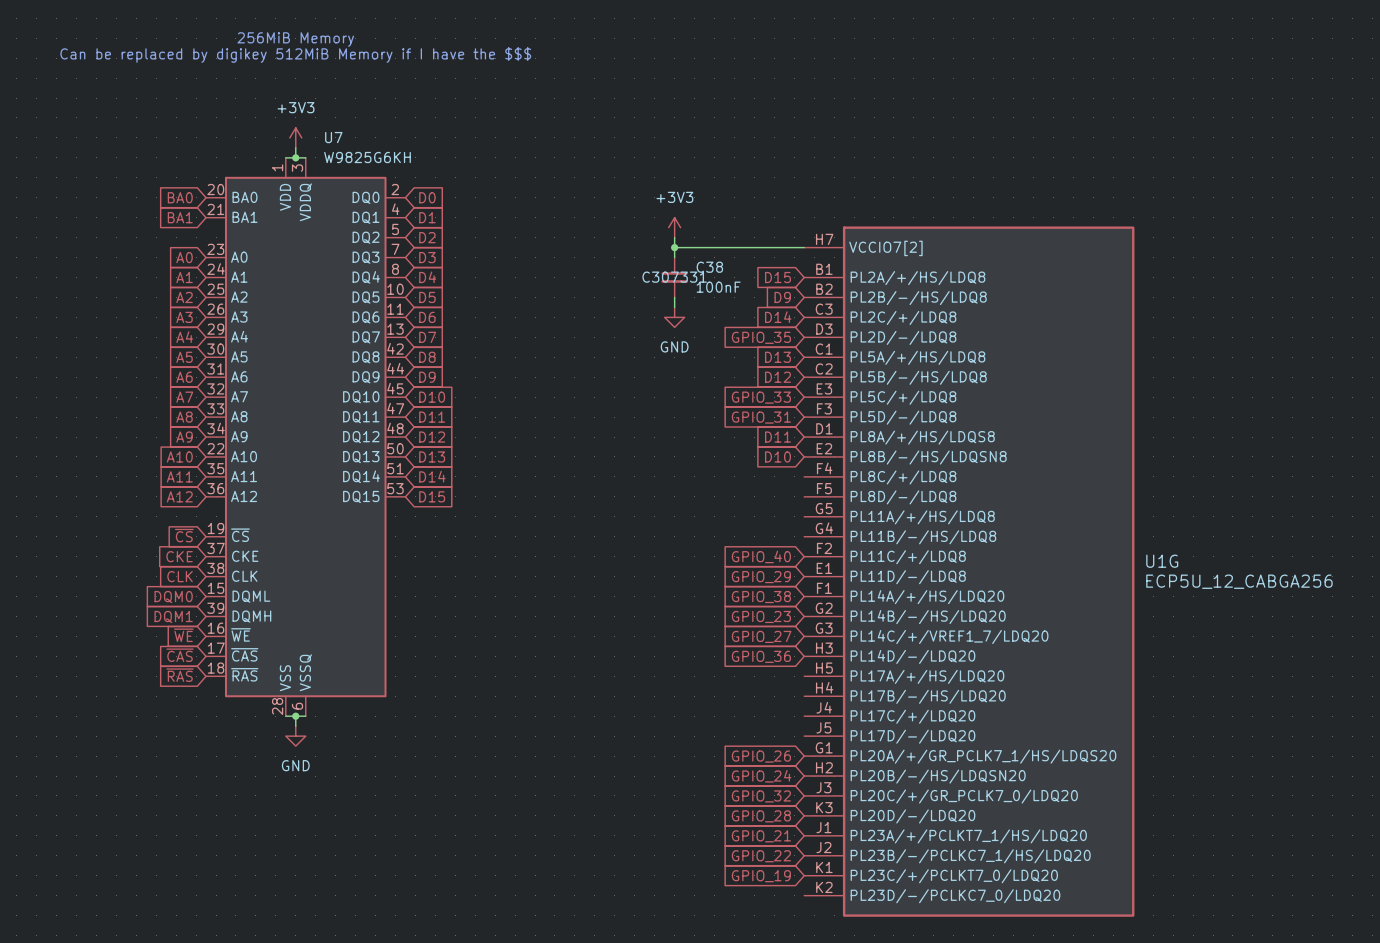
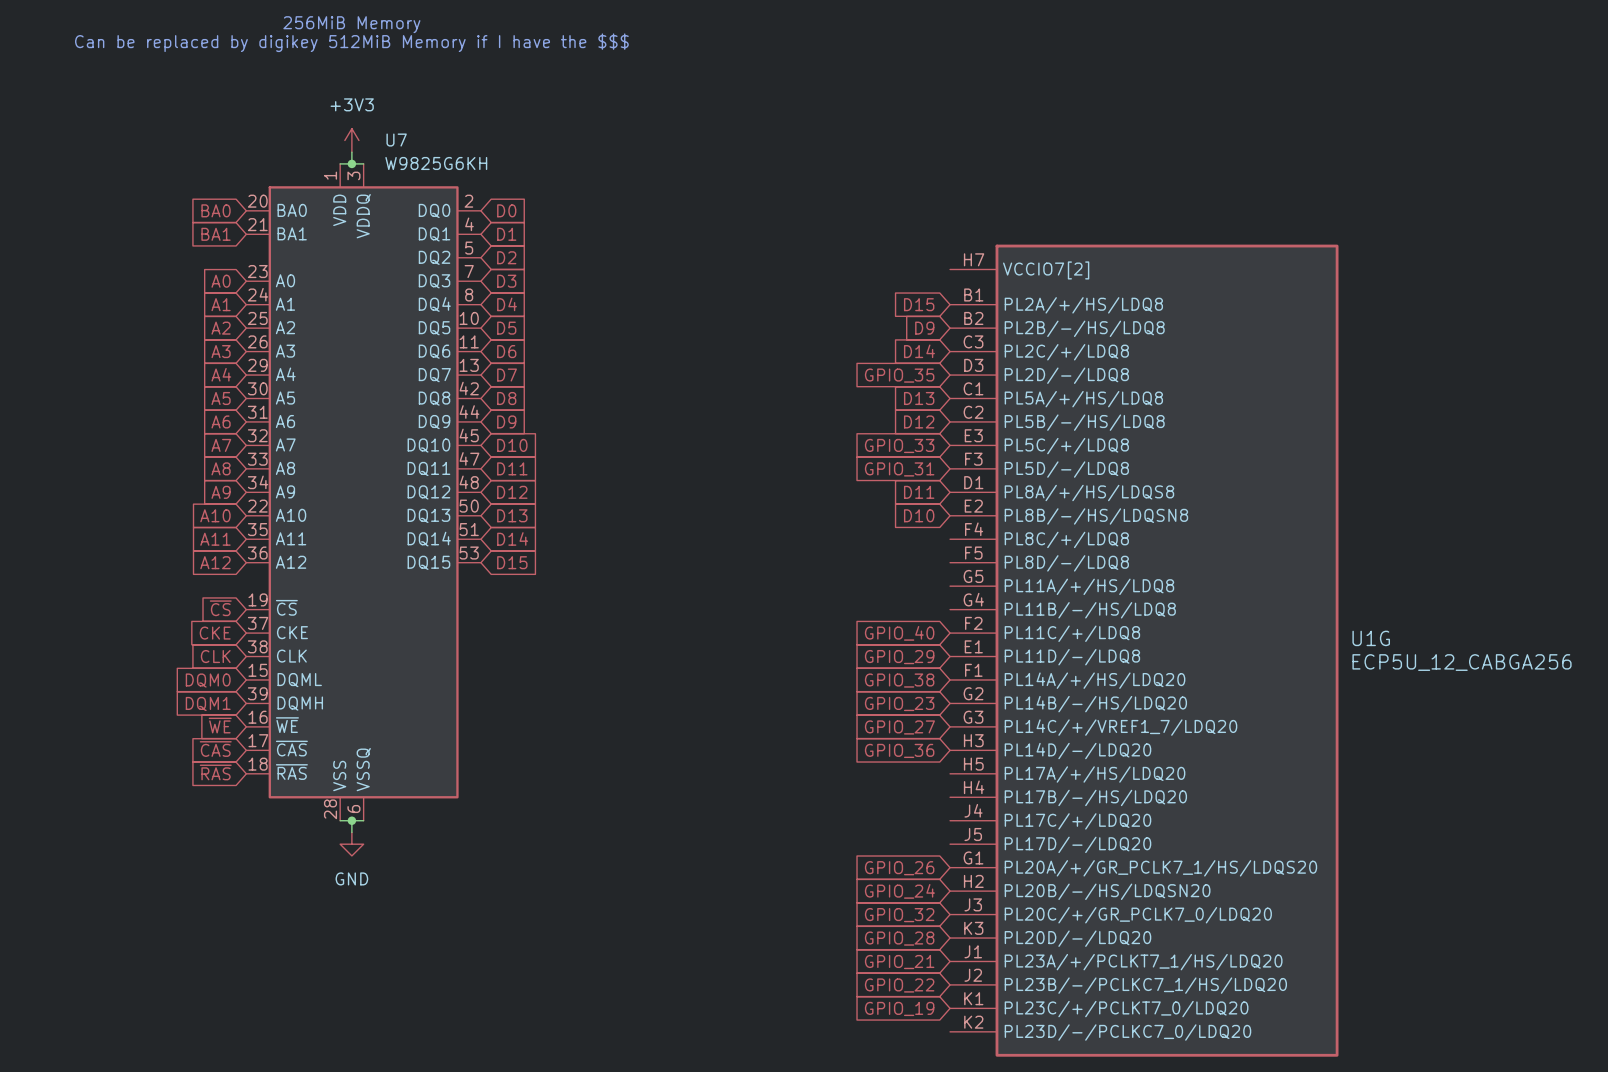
power symbol: +3V3 (674, 227) -> none
wire: (674, 237) (674, 257) -> none
wire: (674, 247) (804, 247) -> none
junction: (674, 247) -> none
C38: 100nF (674, 277) -> none
wire: (674, 297) (674, 307) -> none
power symbol: GND (674, 317) -> none

